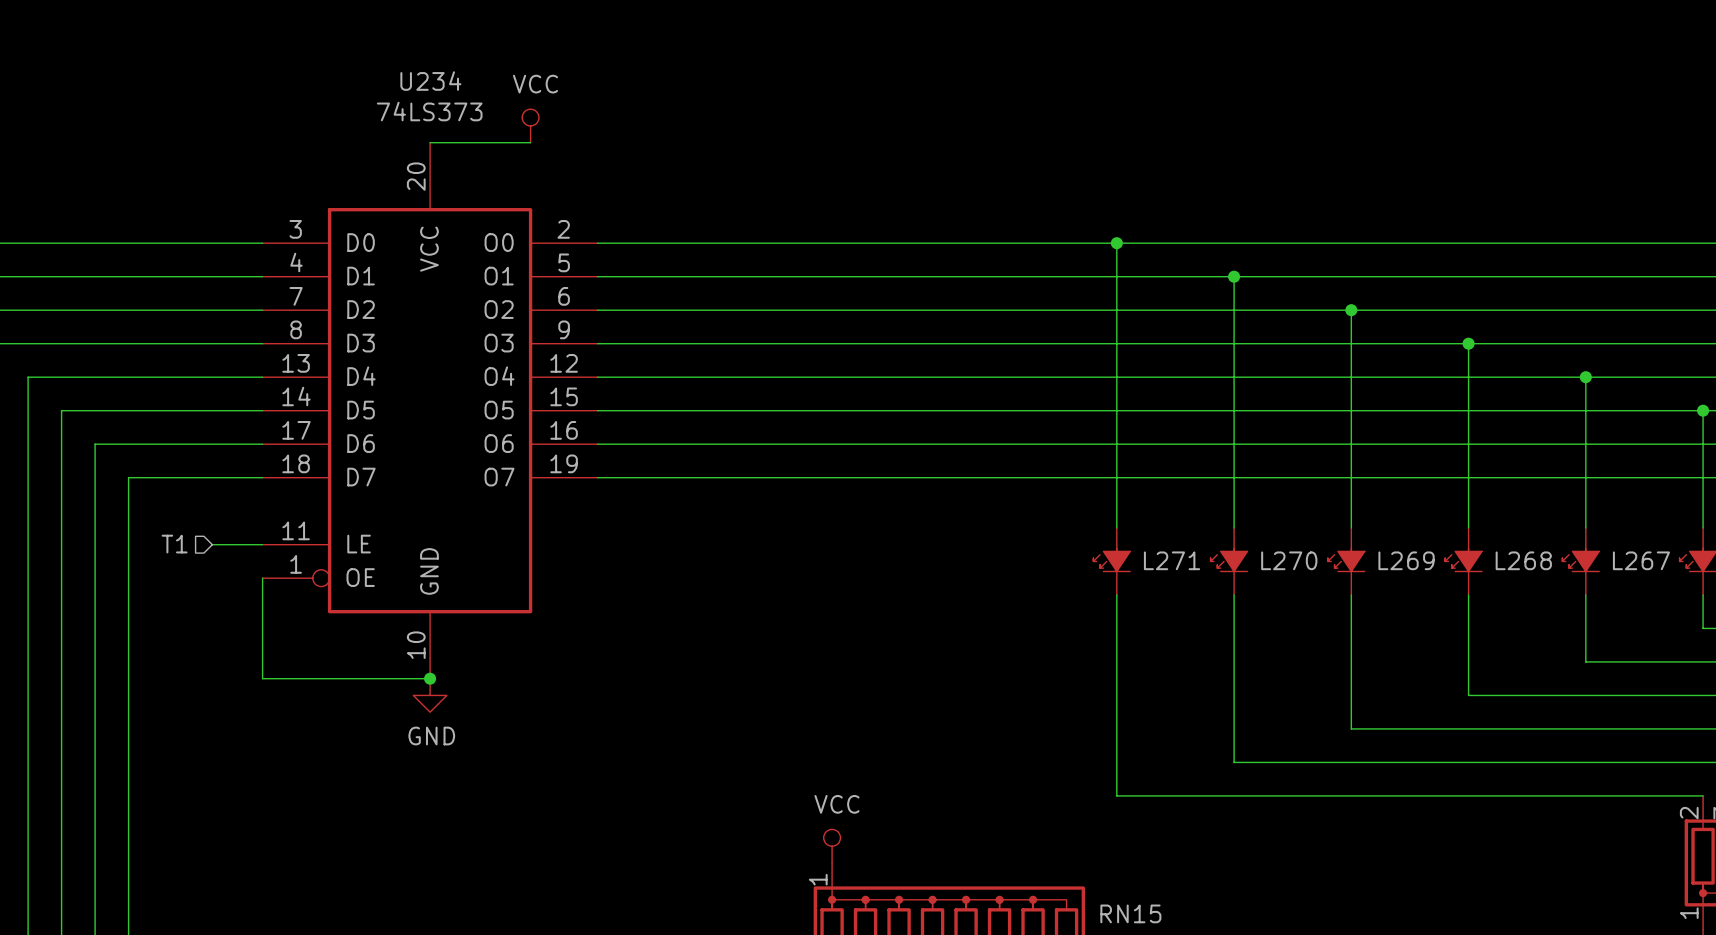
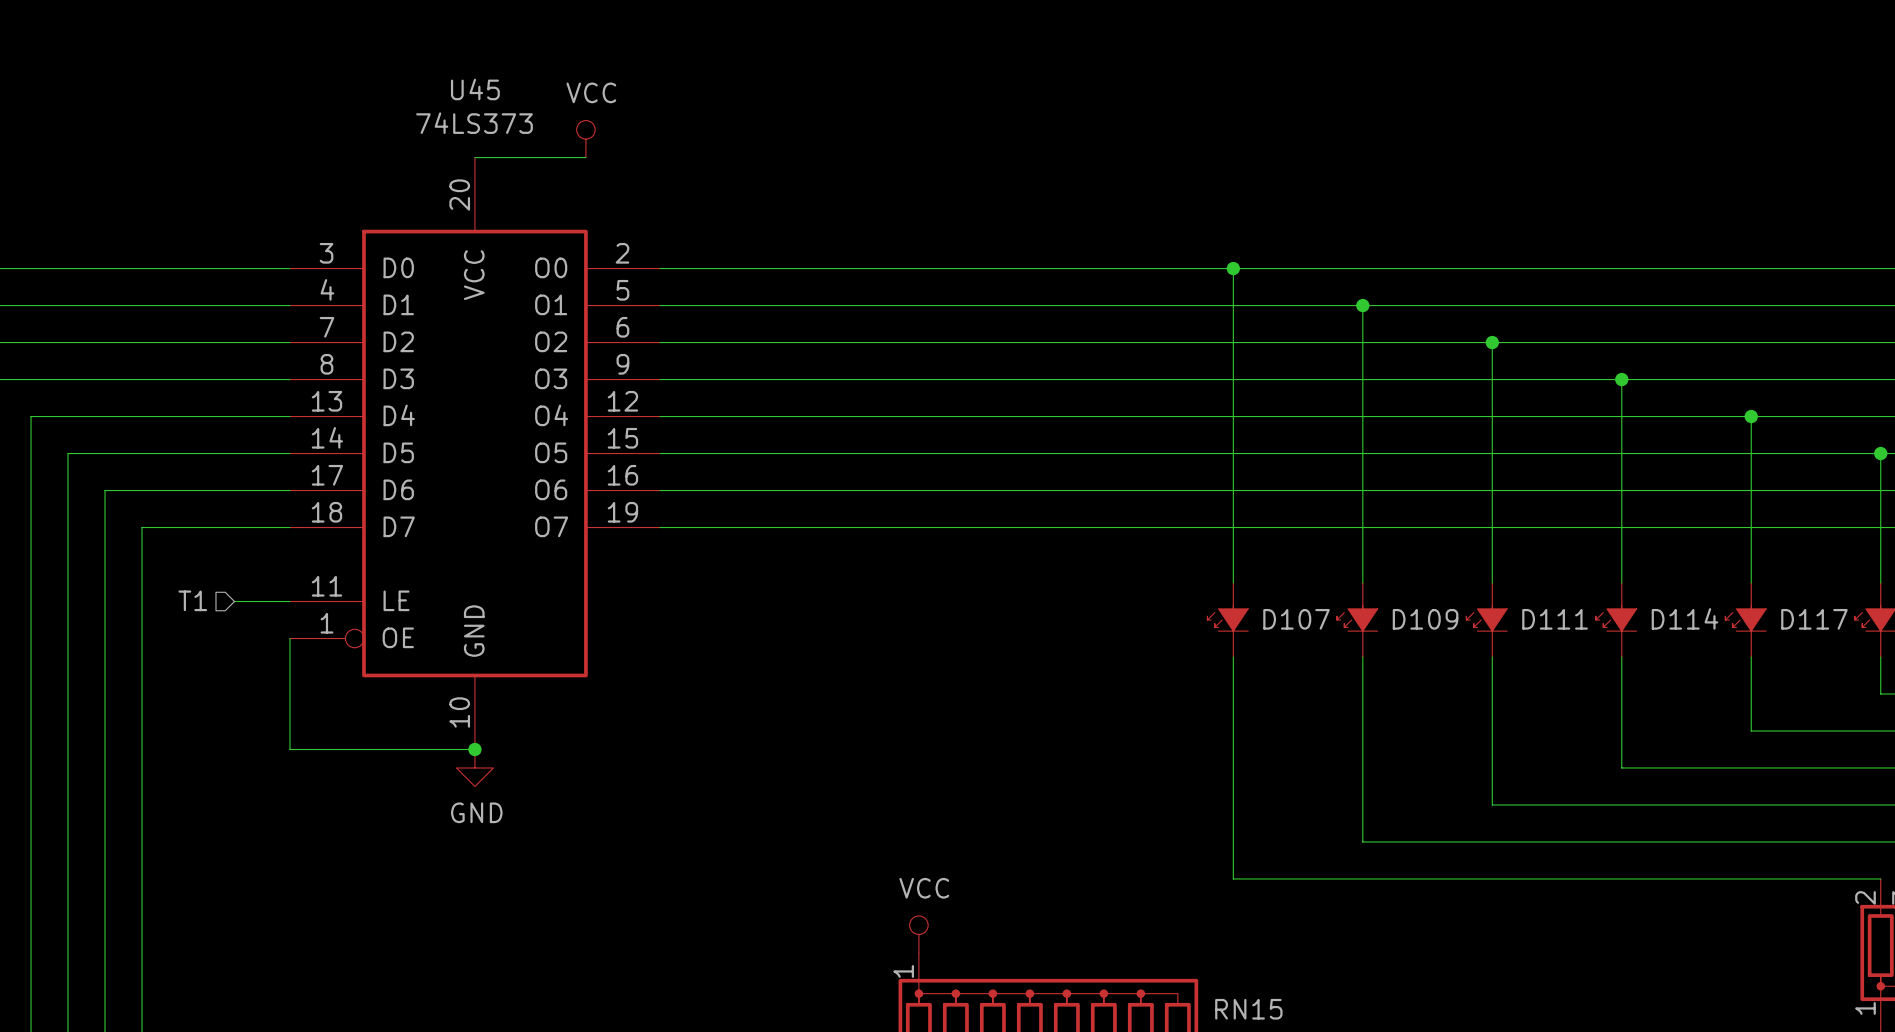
U234 name: U234 (430, 81) -> U45 (475, 89)
L271 name: L271 (1172, 560) -> D107 (1296, 619)
L270 name: L270 (1289, 560) -> D109 (1425, 619)
L269 name: L269 (1406, 560) -> D111 (1555, 619)
L268 name: L268 (1523, 560) -> D114 (1684, 618)
L267 name: L267 (1641, 560) -> D117 (1814, 619)

